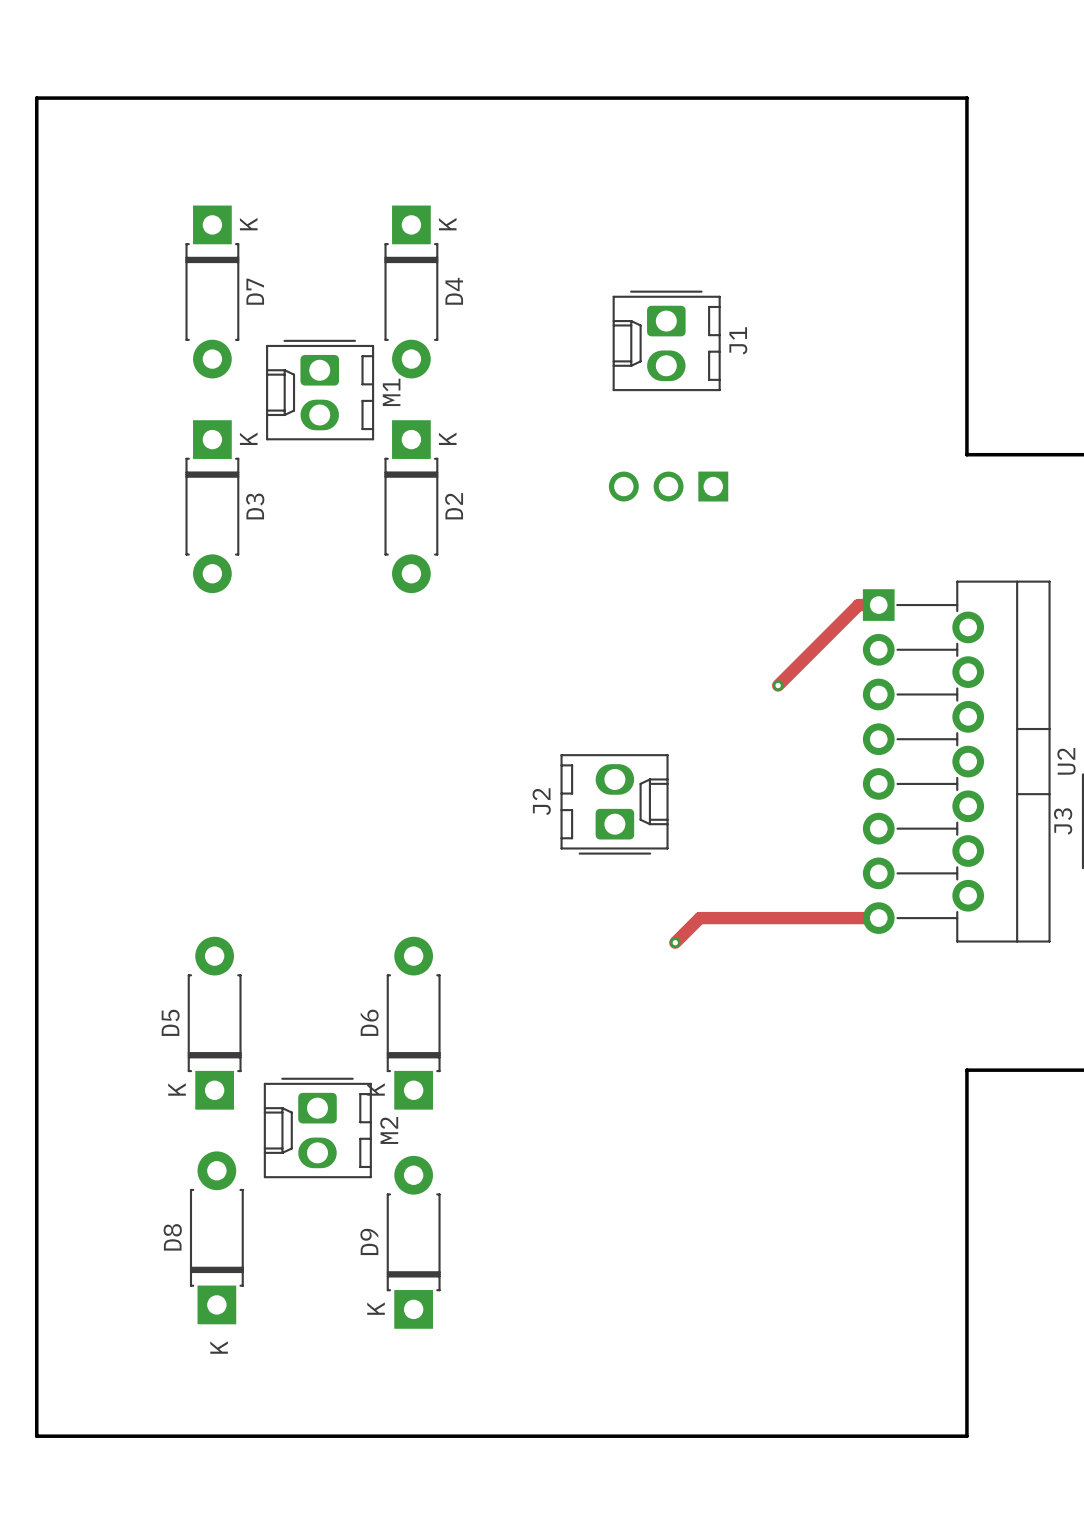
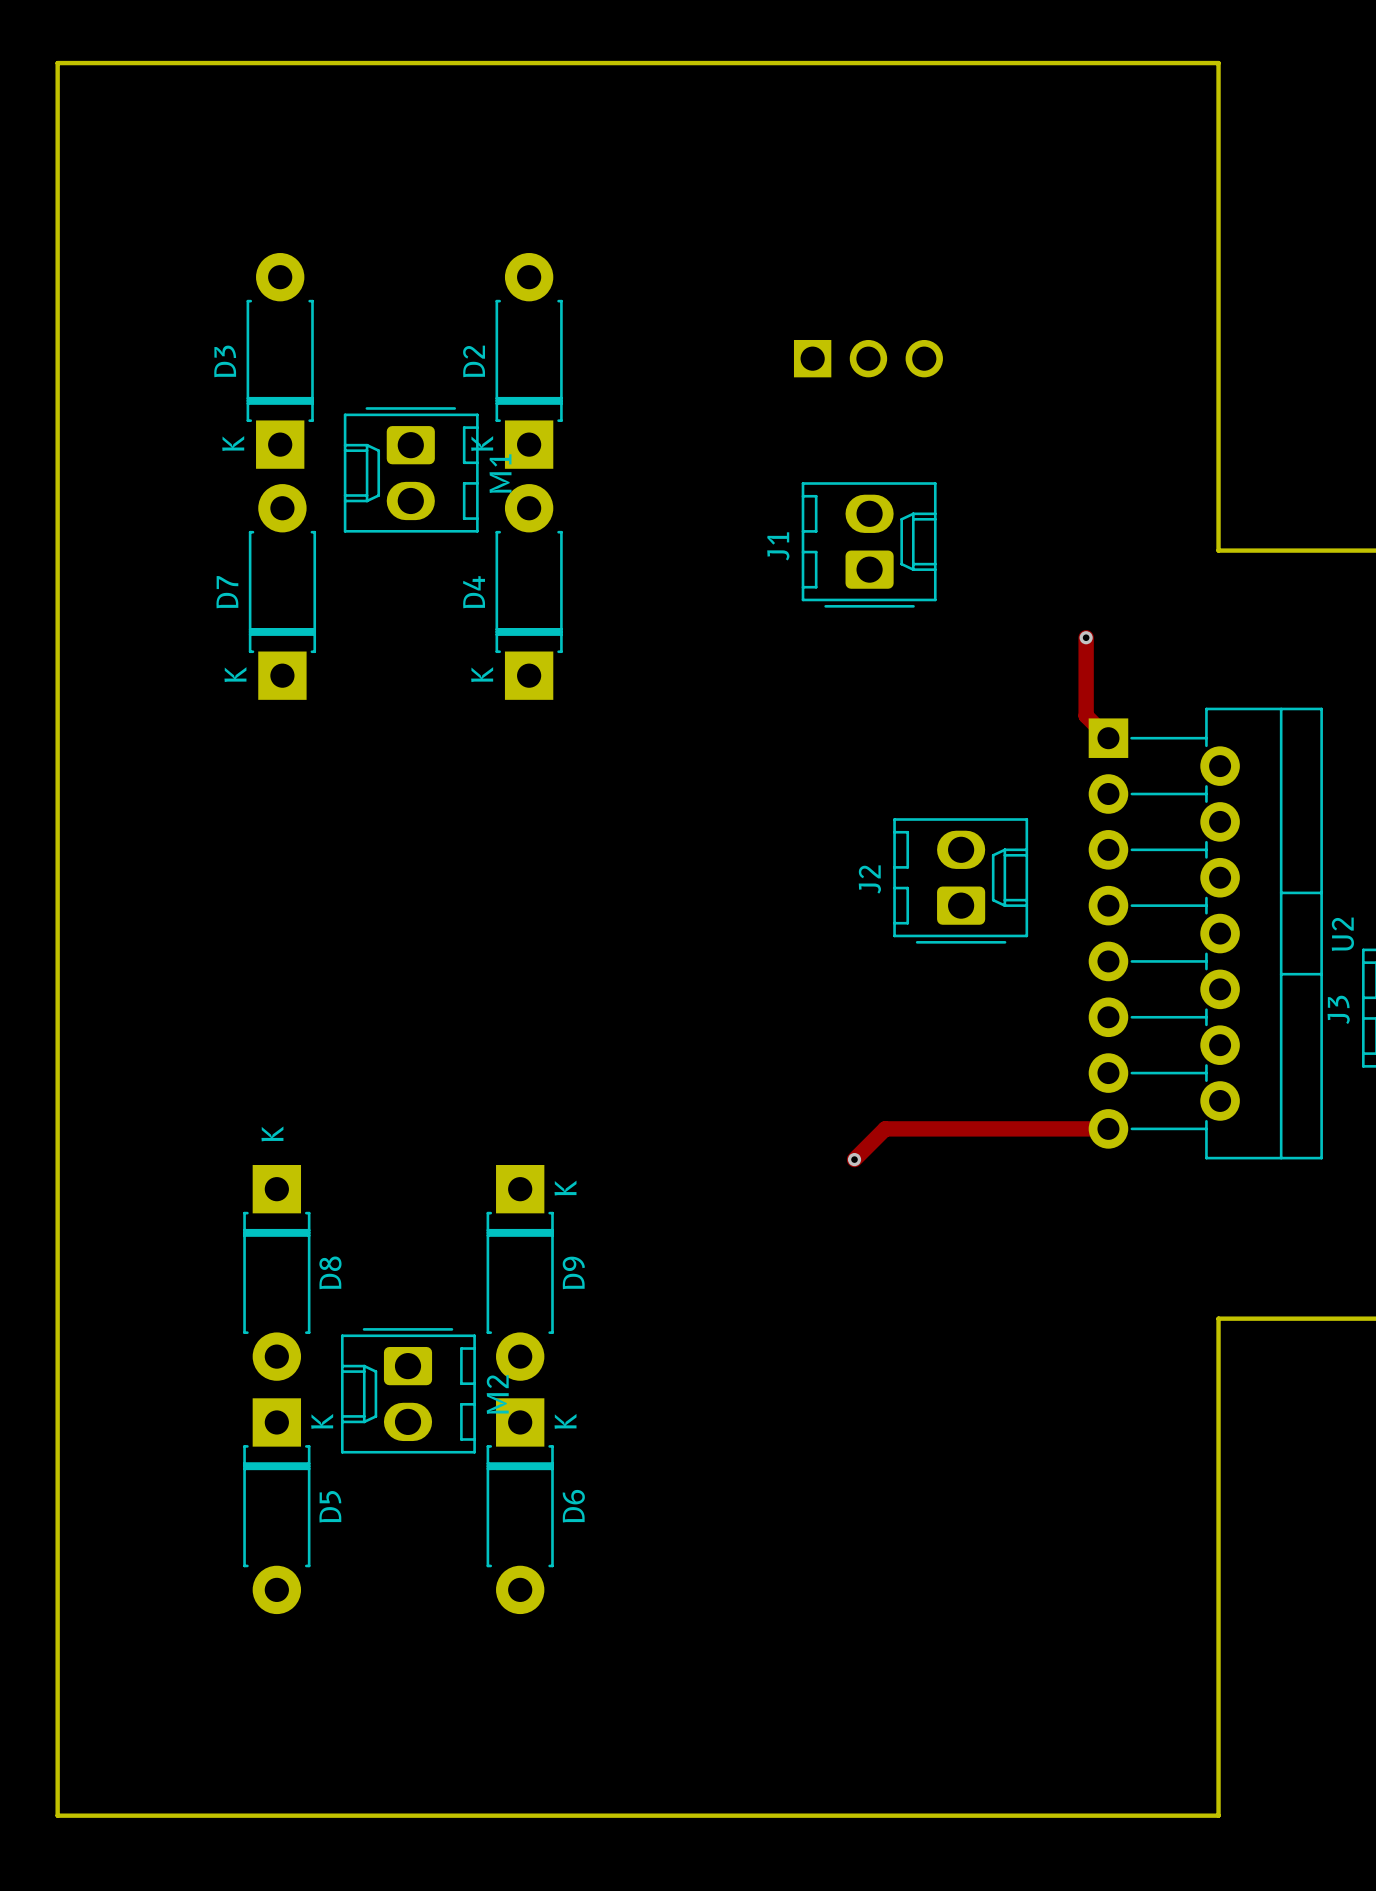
board edge: (36, 98) (966, 98) -> (57, 105) (57, 63) (1218, 63) (1218, 105)
D7 rotation: 0° (212, 291) -> 180° (282, 591)
D7 position: (212, 291) -> (282, 591)
D4 rotation: 0° (411, 291) -> 180° (529, 591)
D4 position: (411, 291) -> (529, 591)
J1 rotation: 0° (666, 340) -> 180° (869, 544)
J1 position: (666, 340) -> (869, 544)
part rotation: 0° (668, 486) -> 180° (868, 358)
part position: (668, 486) -> (868, 358)
D3 rotation: 0° (212, 506) -> 180° (280, 360)
D3 position: (212, 506) -> (280, 360)
D2 rotation: 0° (411, 506) -> 180° (529, 360)
D2 position: (411, 506) -> (529, 360)
via: none -> (1086, 637)
track: (878, 605) (858, 605) (778, 685) -> (1108, 738) (1086, 715) (1086, 637)
via: (778, 685) -> none
J2 position: (614, 804) -> (960, 880)
D5 rotation: 0° (214, 1023) -> 180° (276, 1506)
D5 position: (214, 1023) -> (276, 1506)
D6 rotation: 0° (413, 1023) -> 180° (520, 1506)
D6 position: (413, 1023) -> (520, 1506)
D8 rotation: 0° (216, 1237) -> 180° (276, 1272)
D8 position: (216, 1237) -> (276, 1272)
D9 rotation: 0° (413, 1242) -> 180° (520, 1272)
D9 position: (413, 1242) -> (520, 1272)
board edge: (36, 1436) (966, 1436) -> (57, 1775) (57, 1815) (1218, 1815) (1218, 1775)

